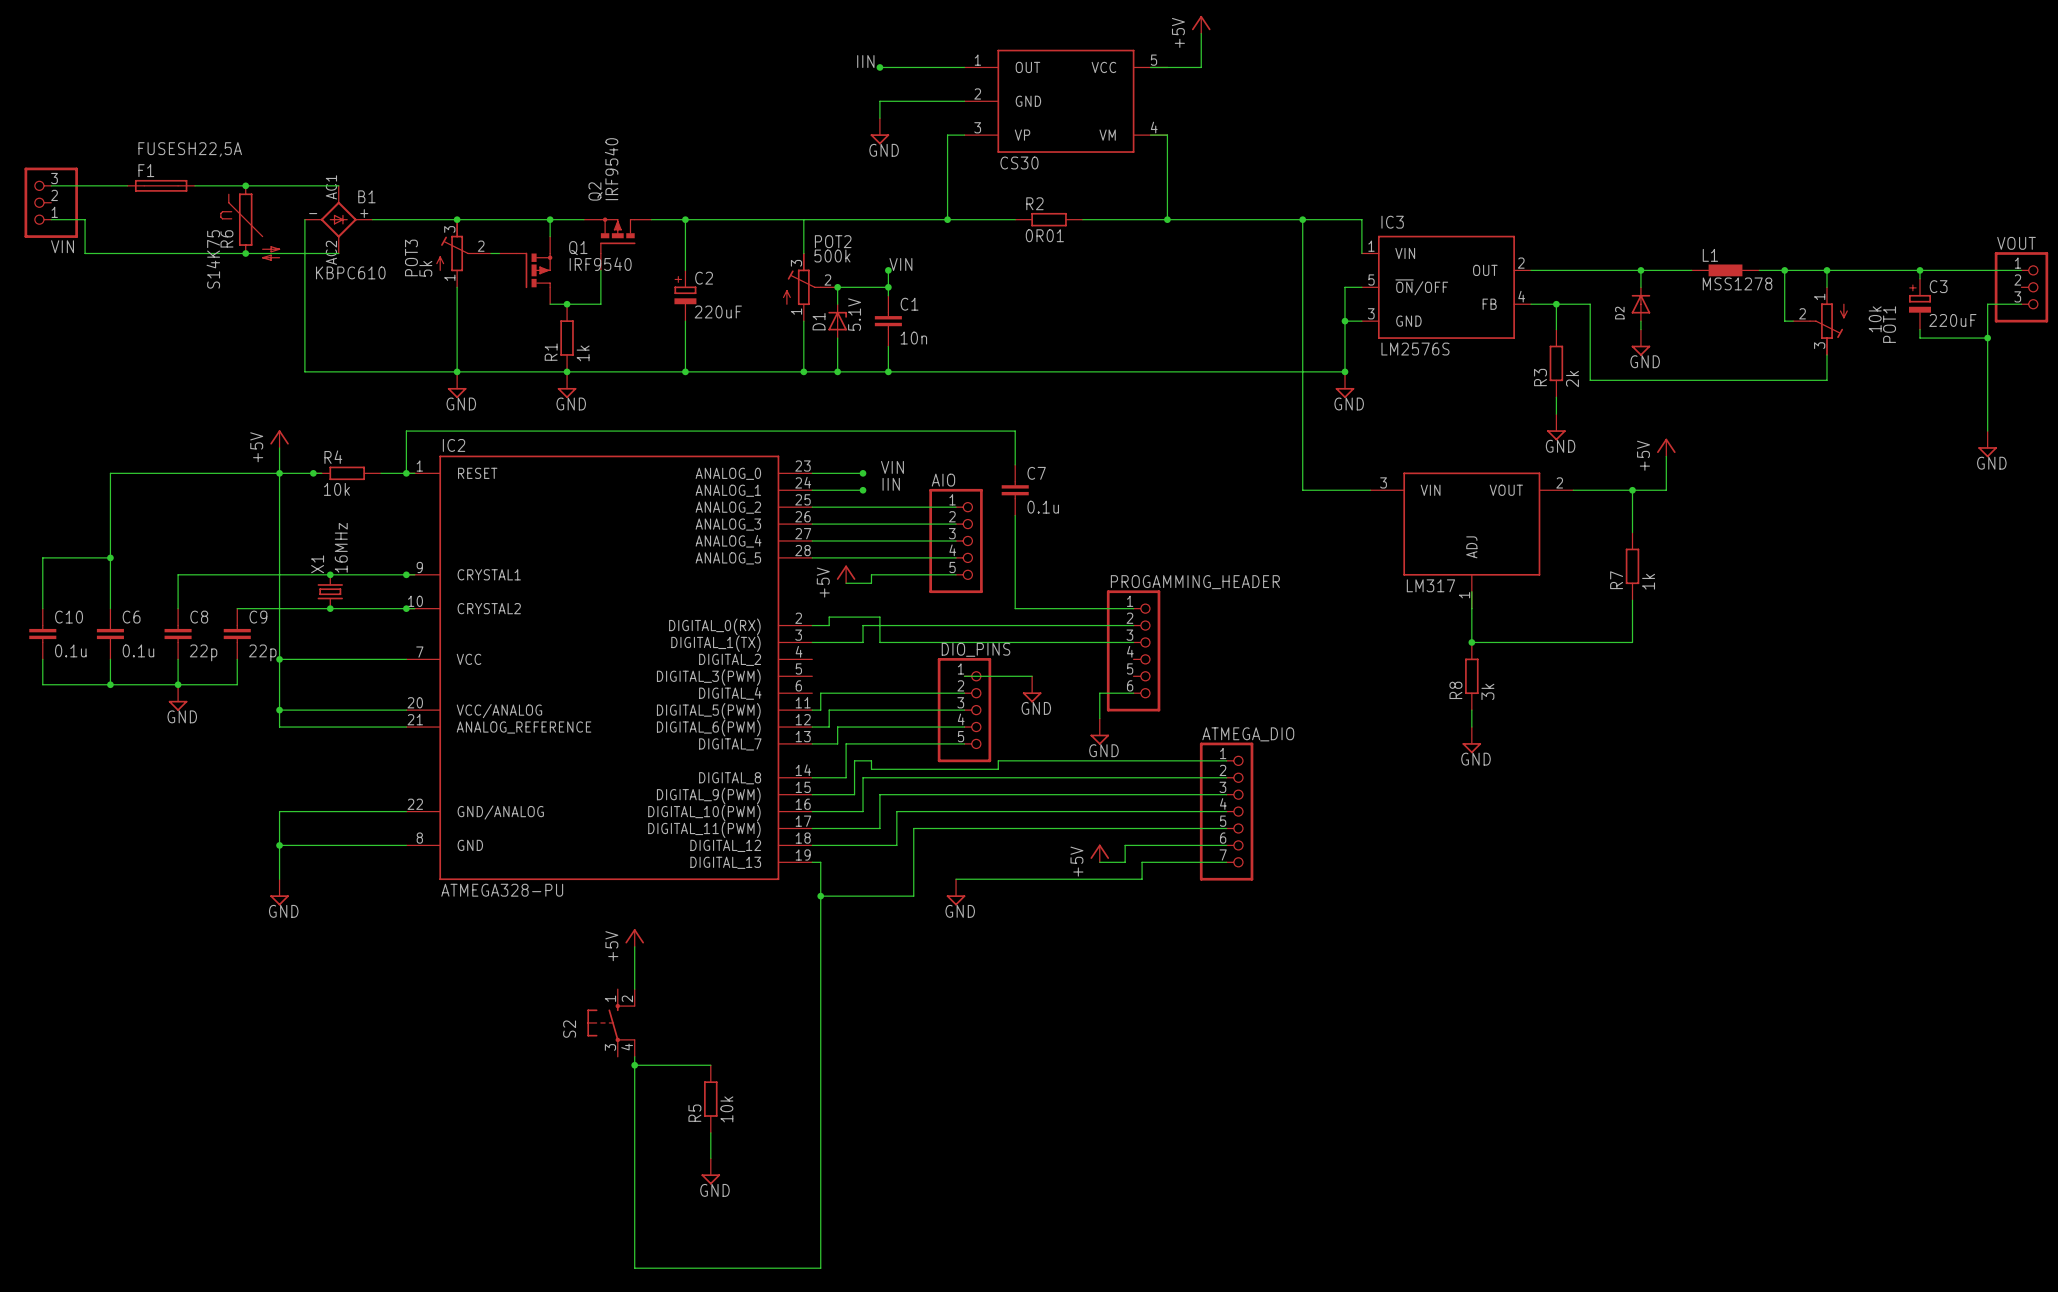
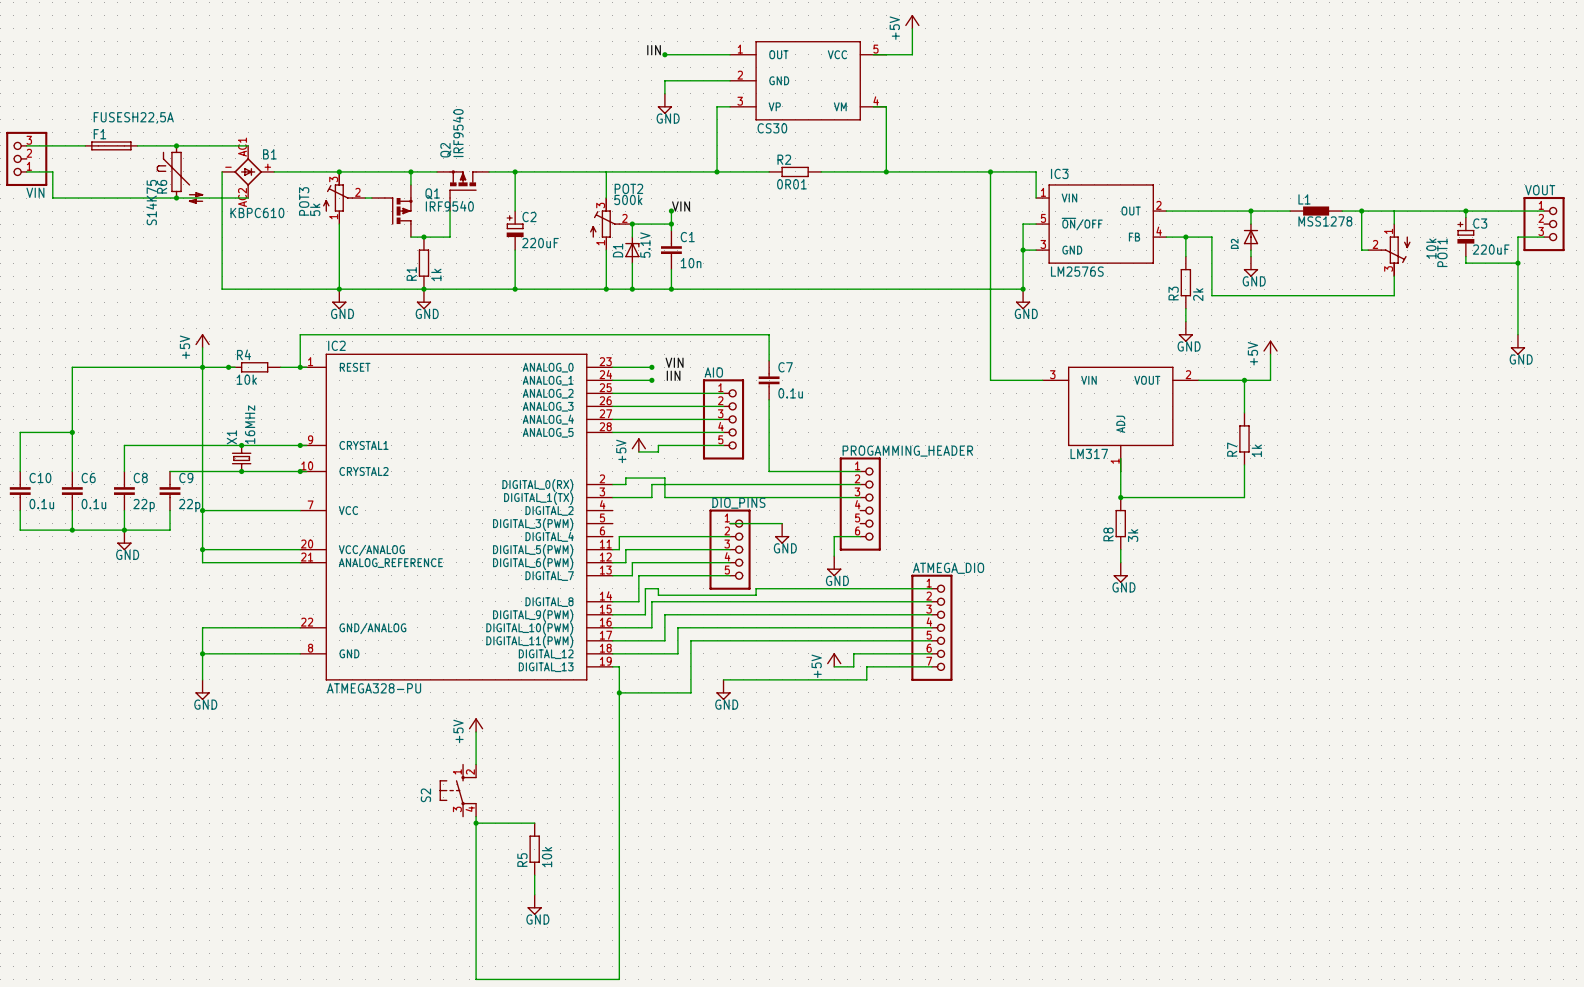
junction: (1826, 270) -> none

